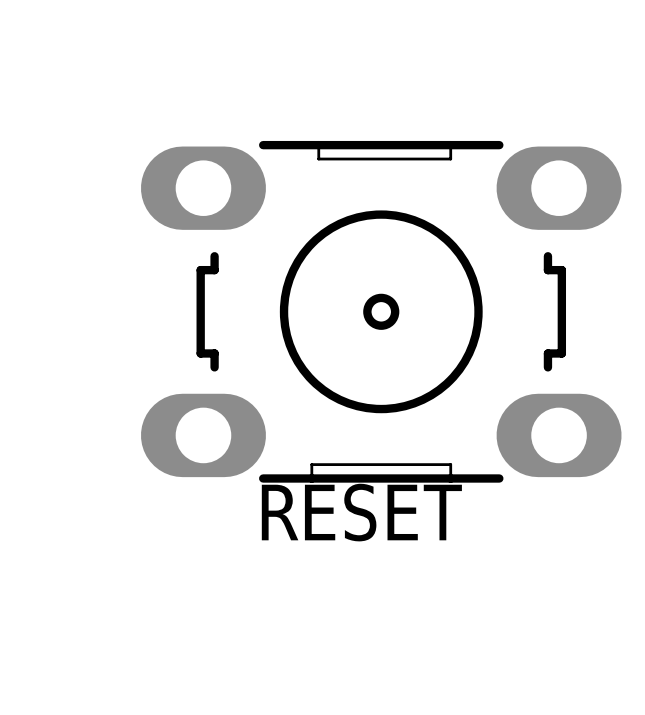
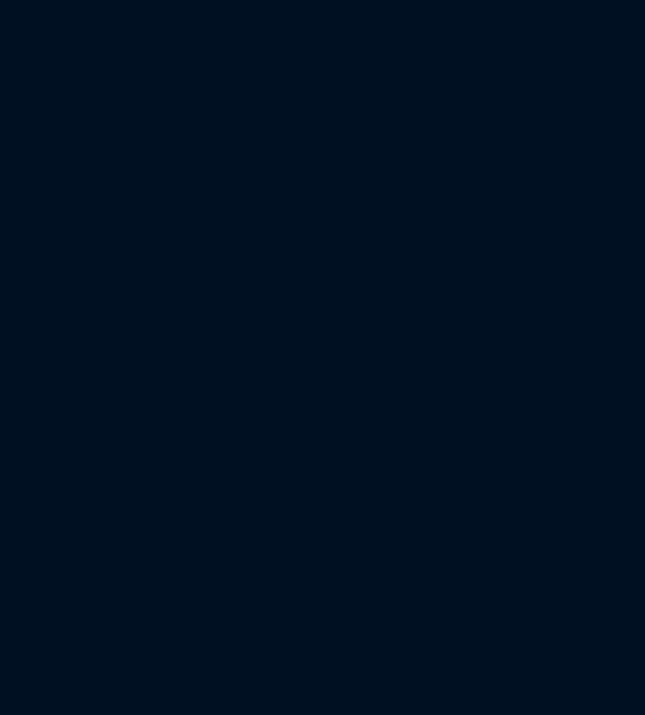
RESET: (381, 311) -> none

